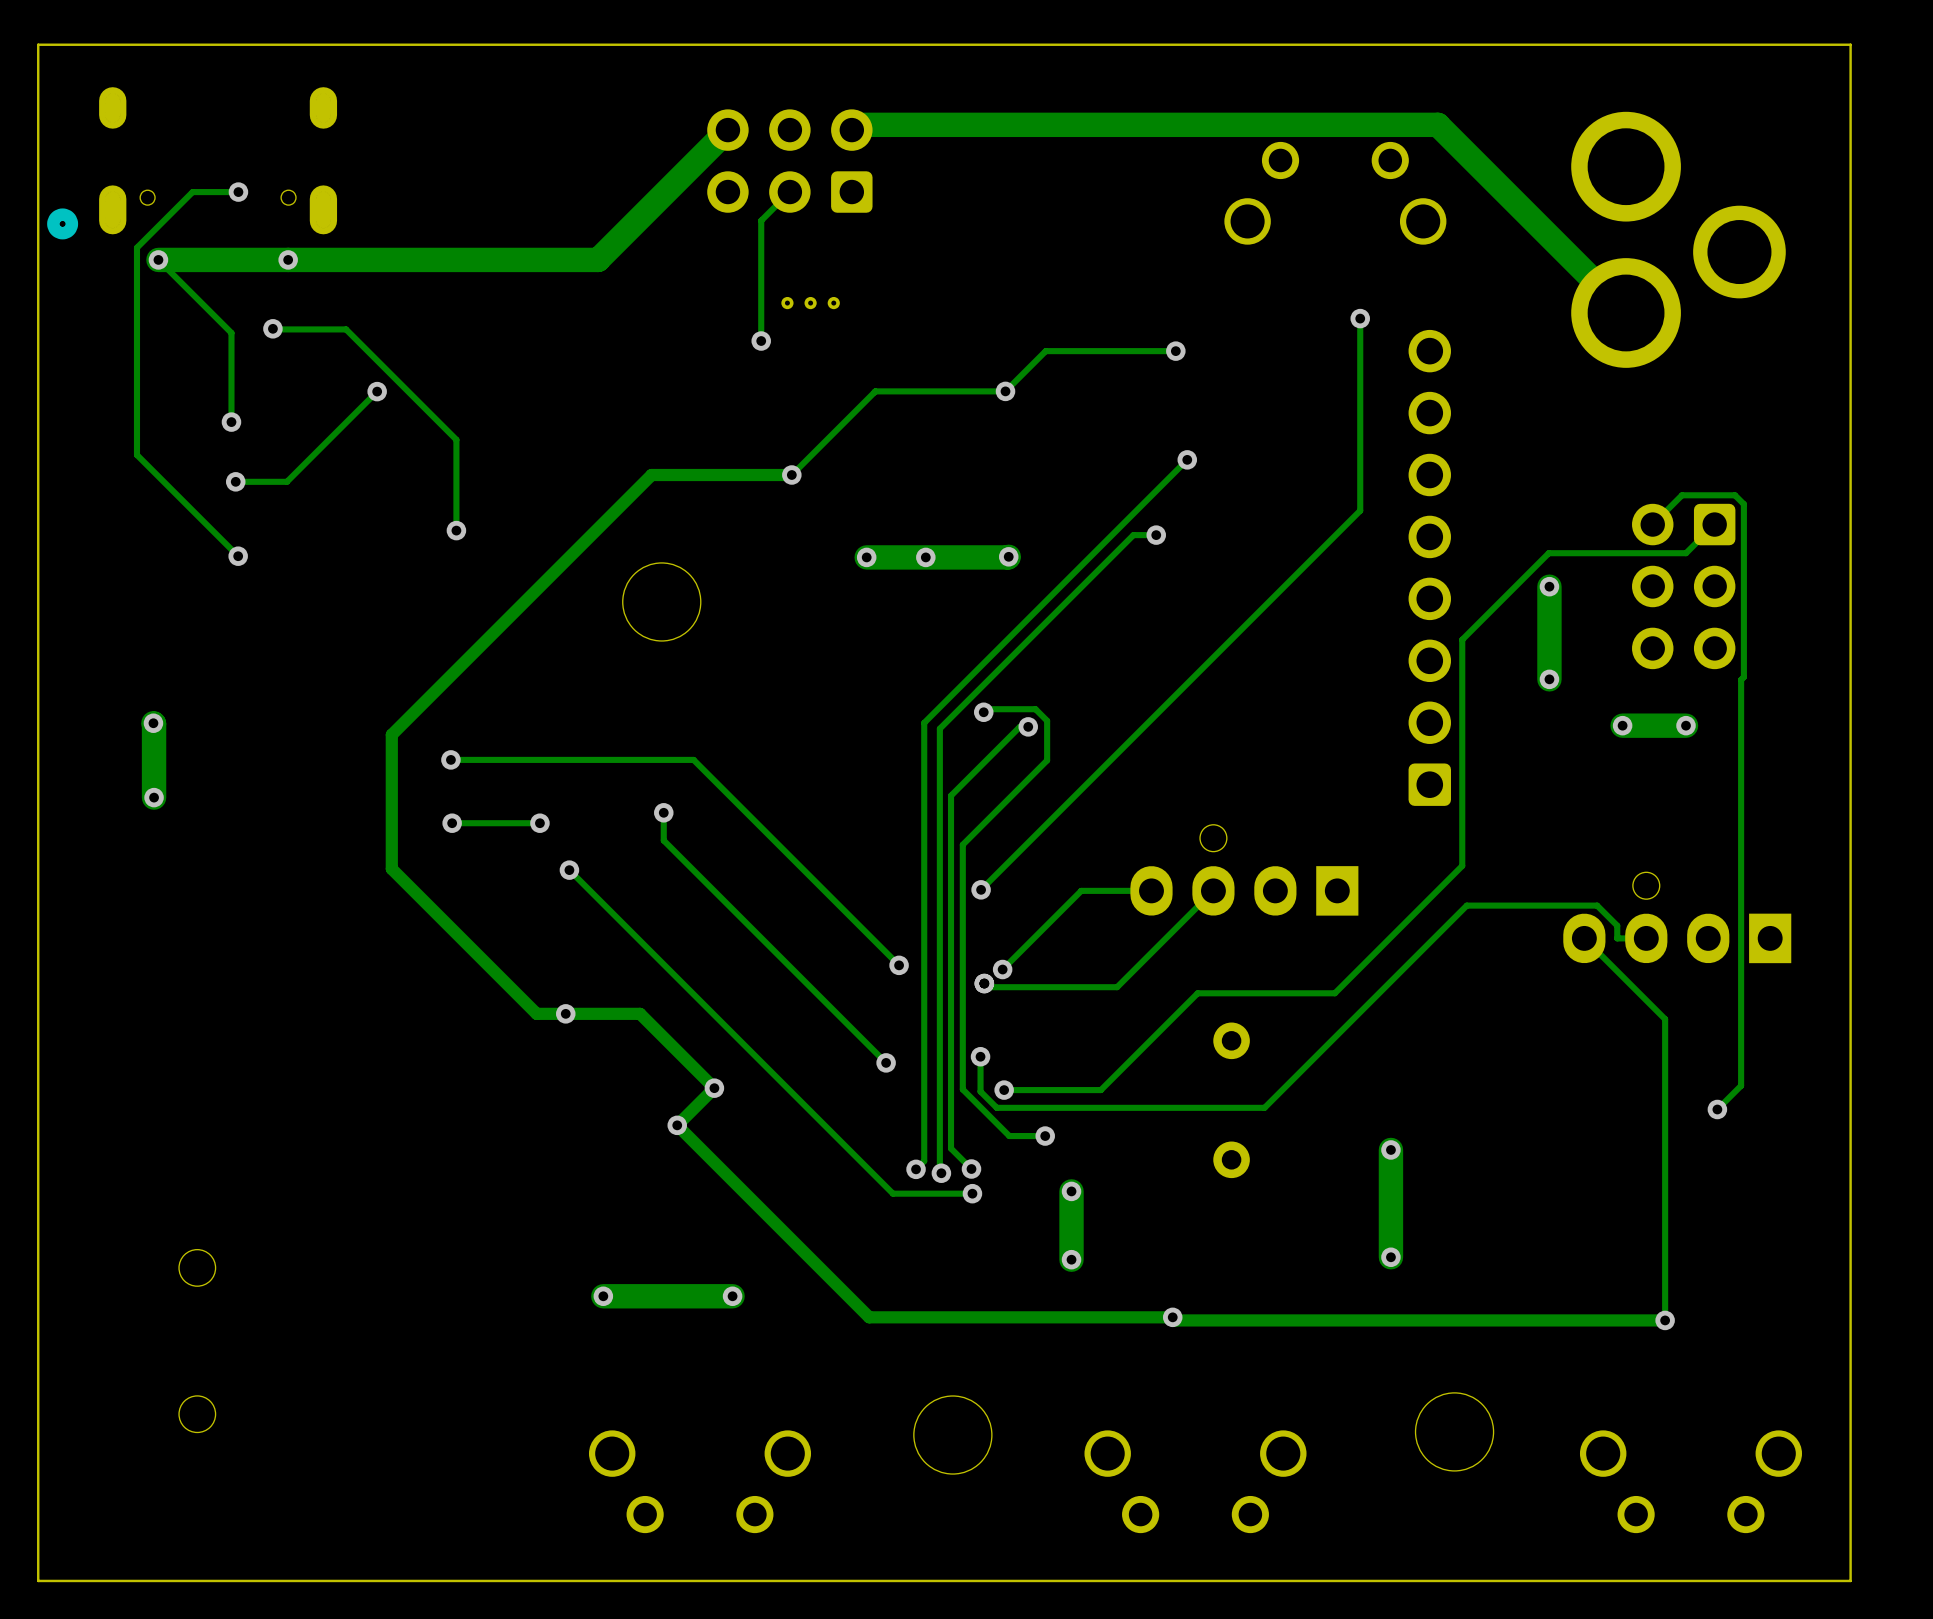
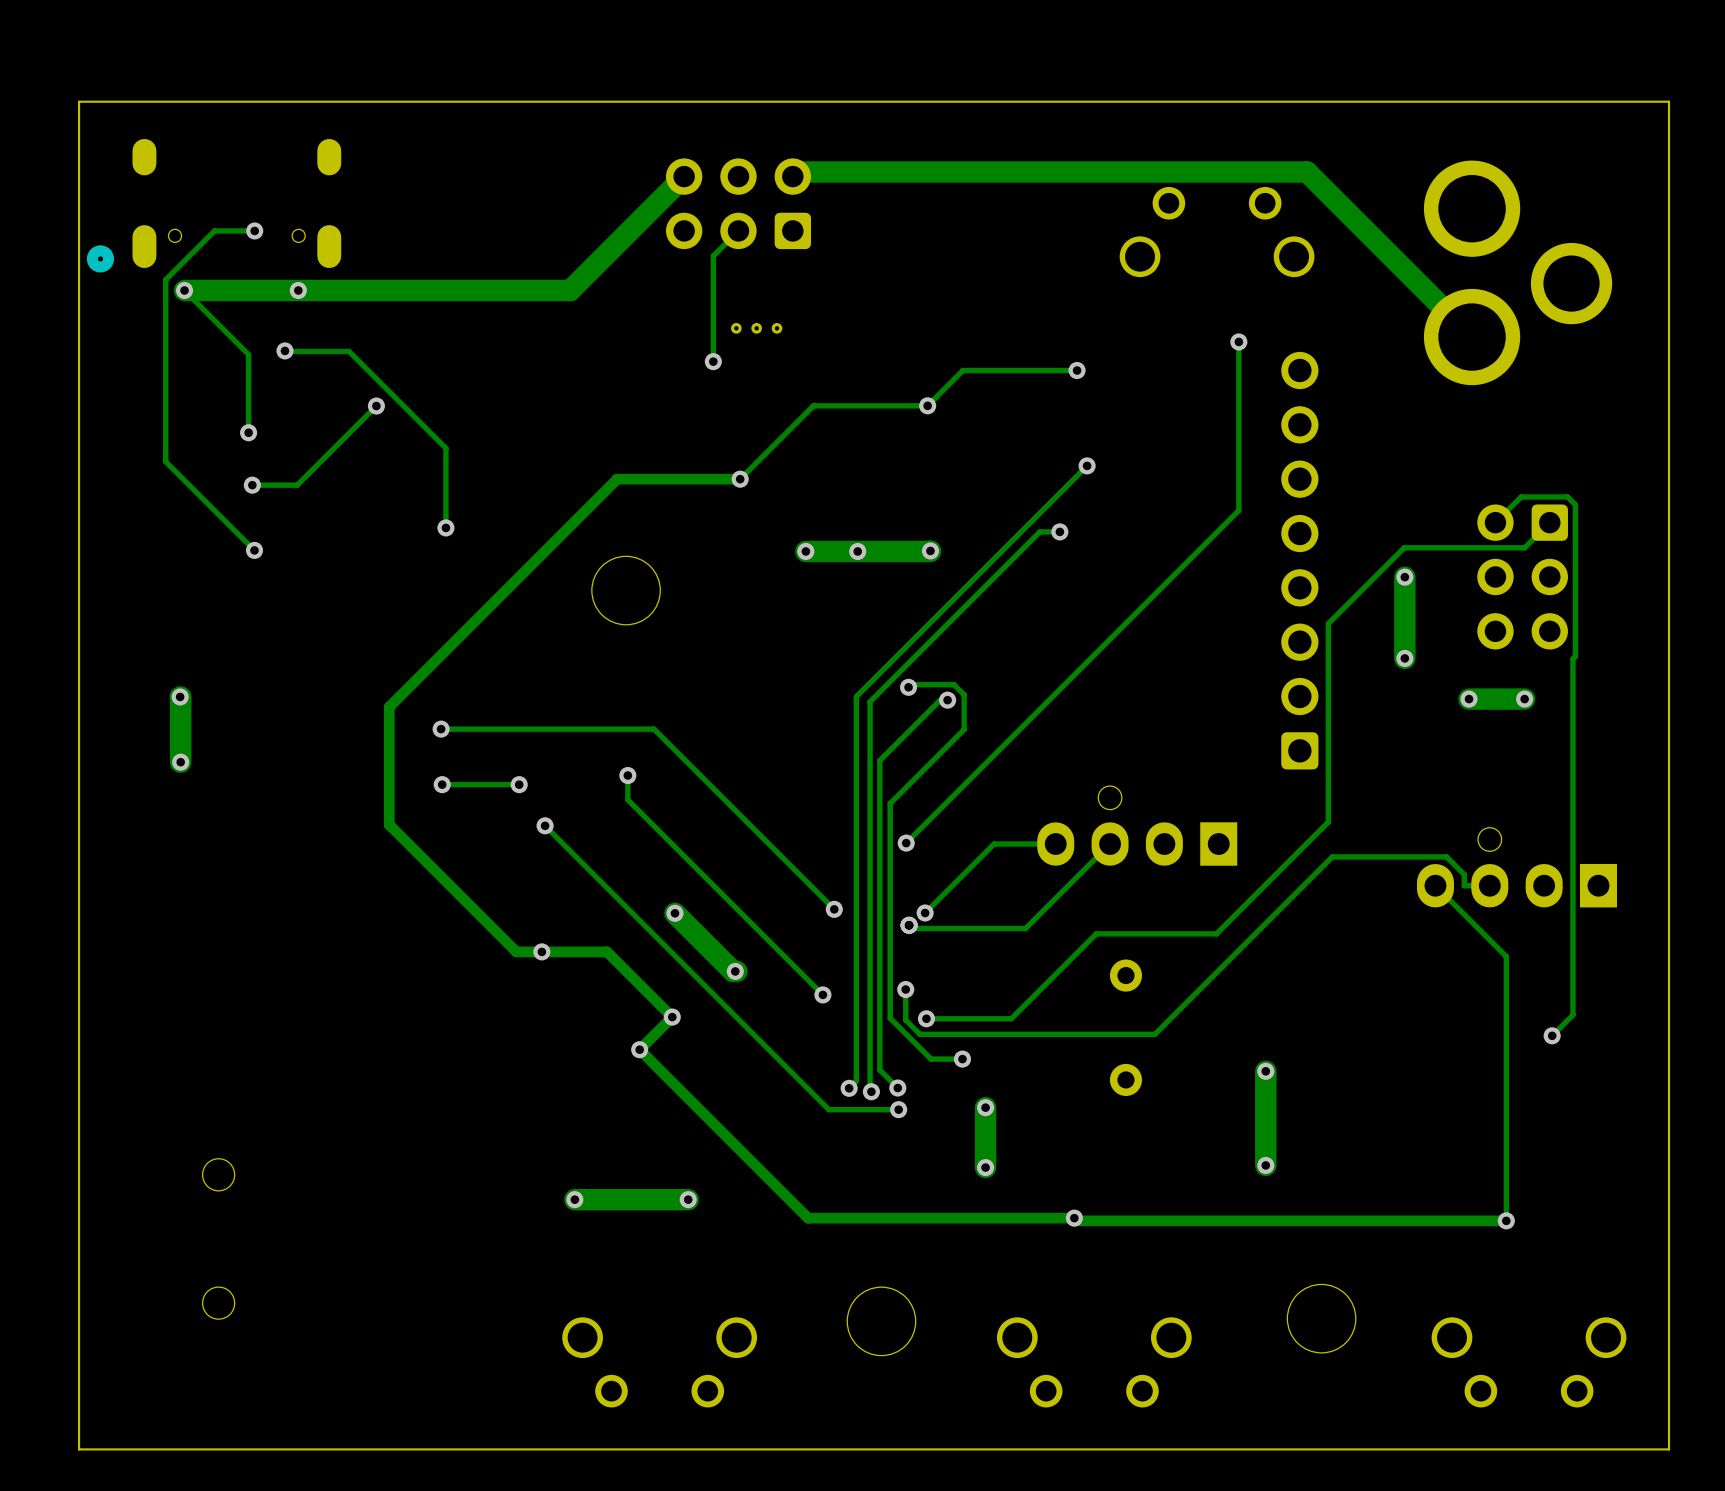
track: none -> (674, 913) (733, 971) (736, 971)
via: none -> (674, 913)
via: none -> (735, 971)

